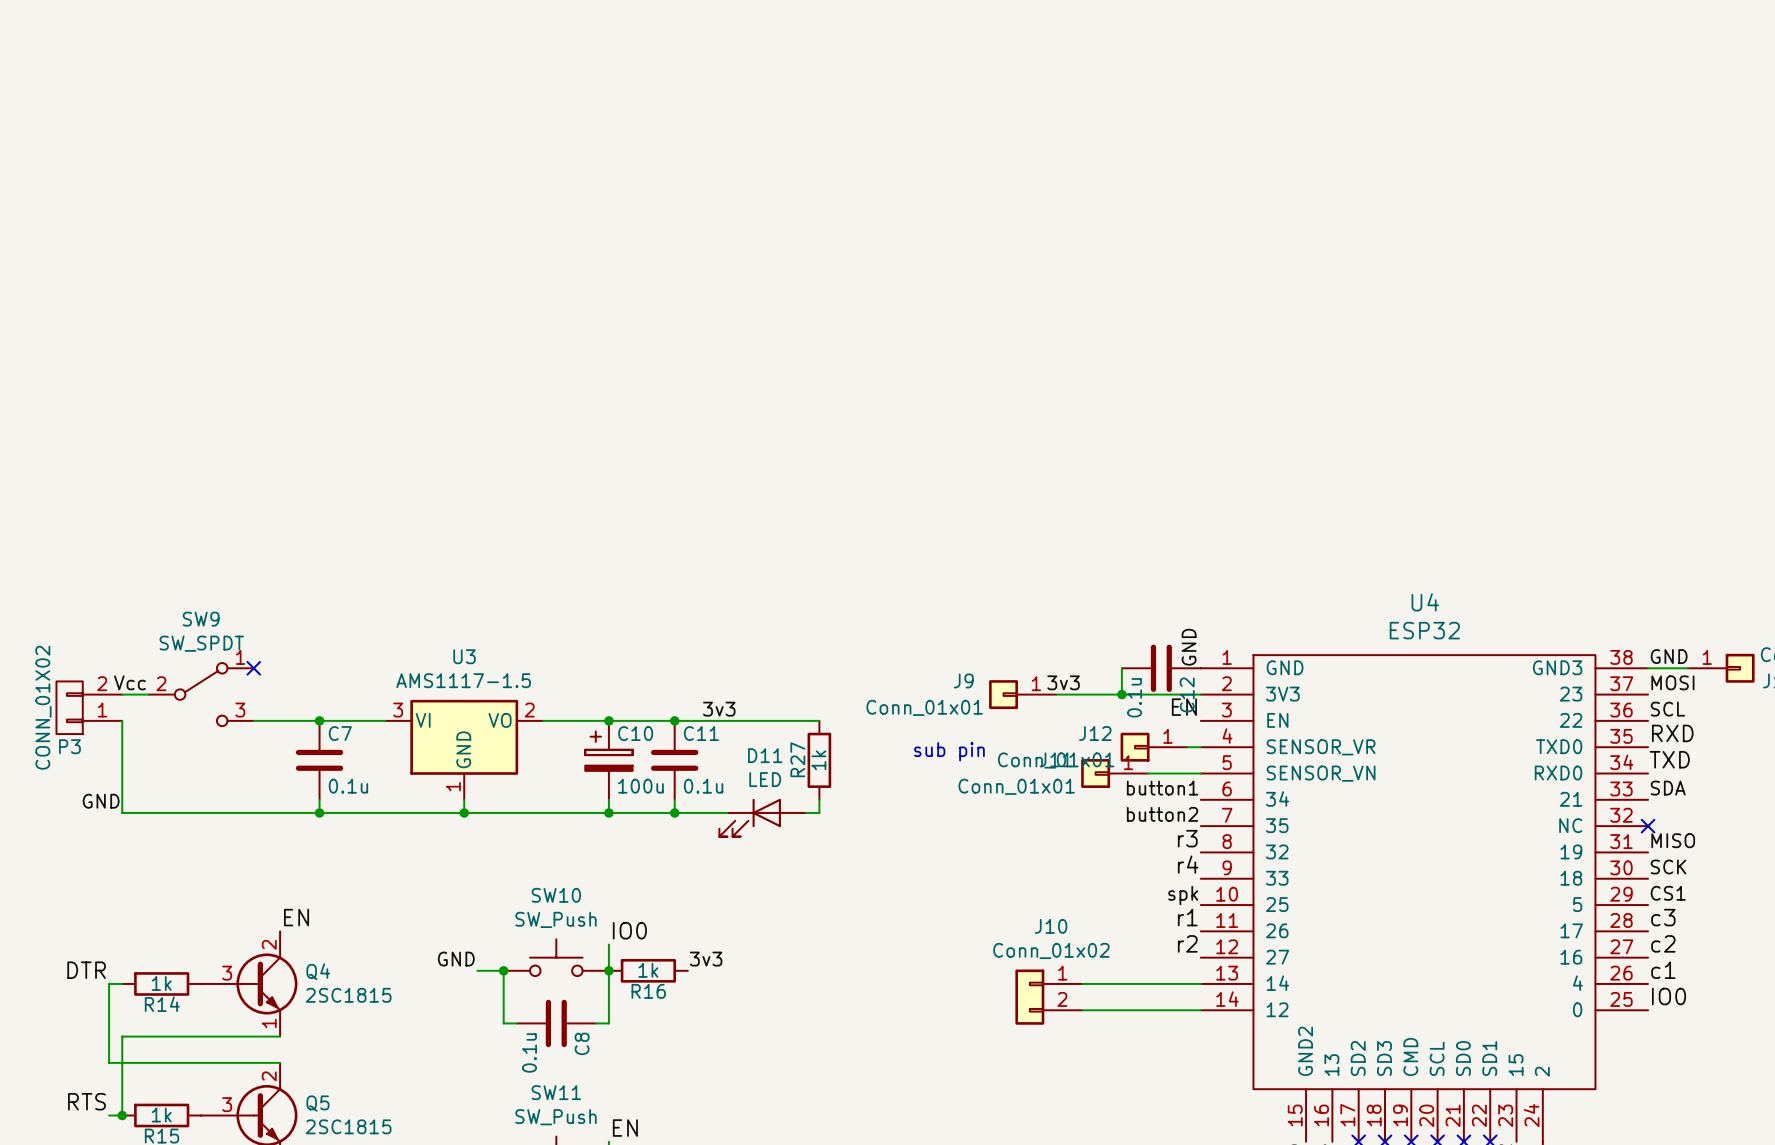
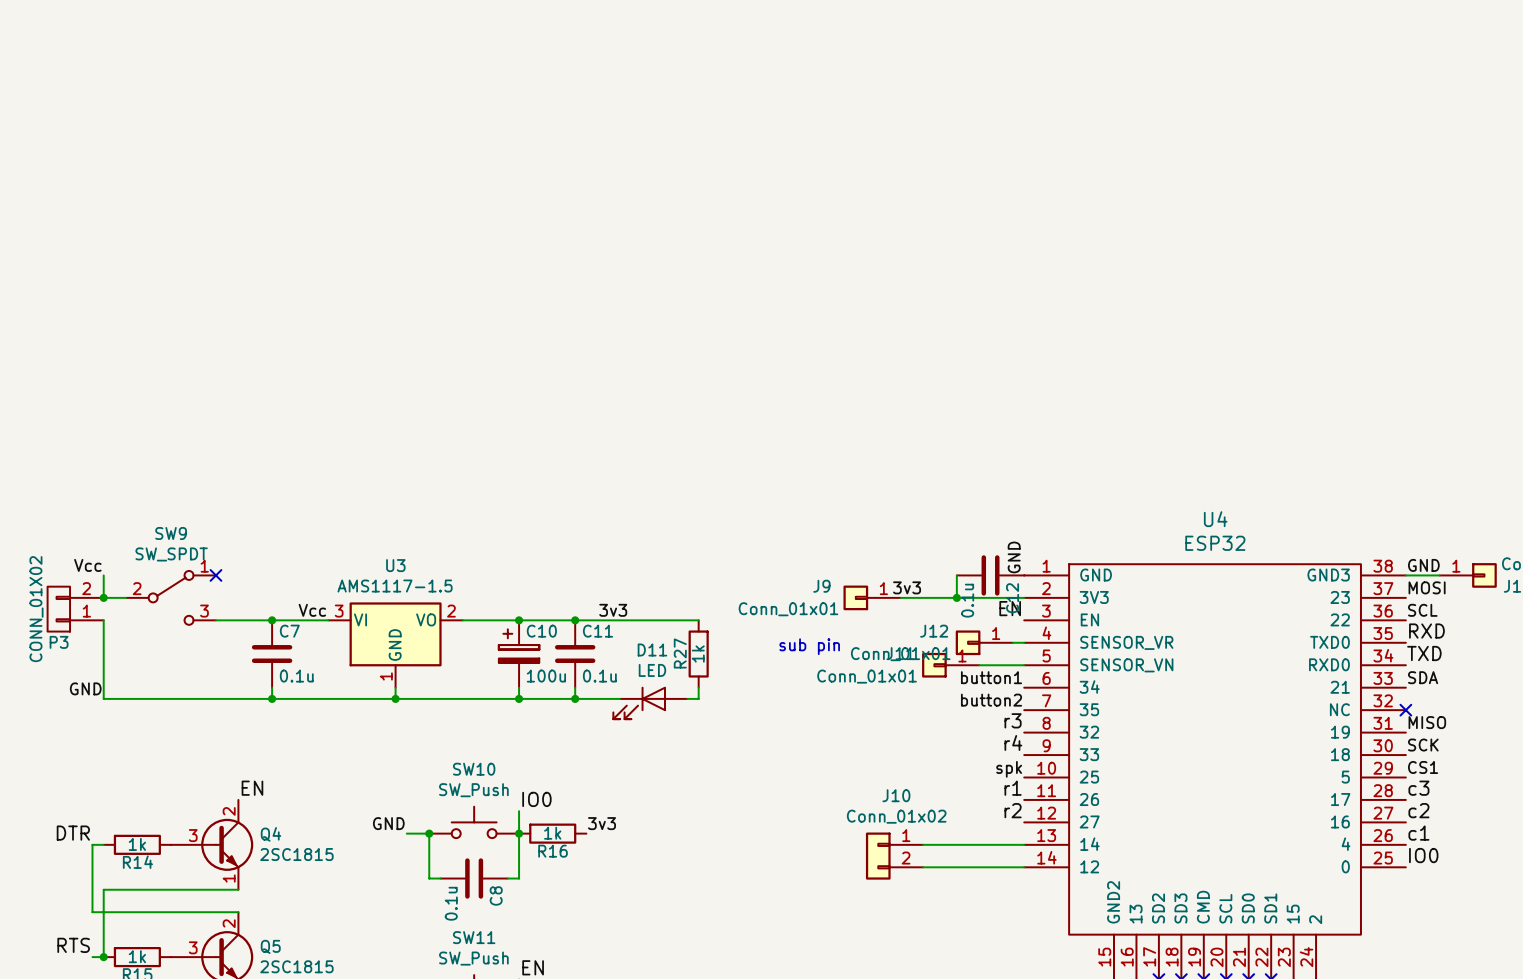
wire: none -> (103, 575) (103, 597)
label position: Vcc (129, 682) -> Vcc (87, 565)
junction: none -> (103, 597)
label: none -> Vcc (312, 610)

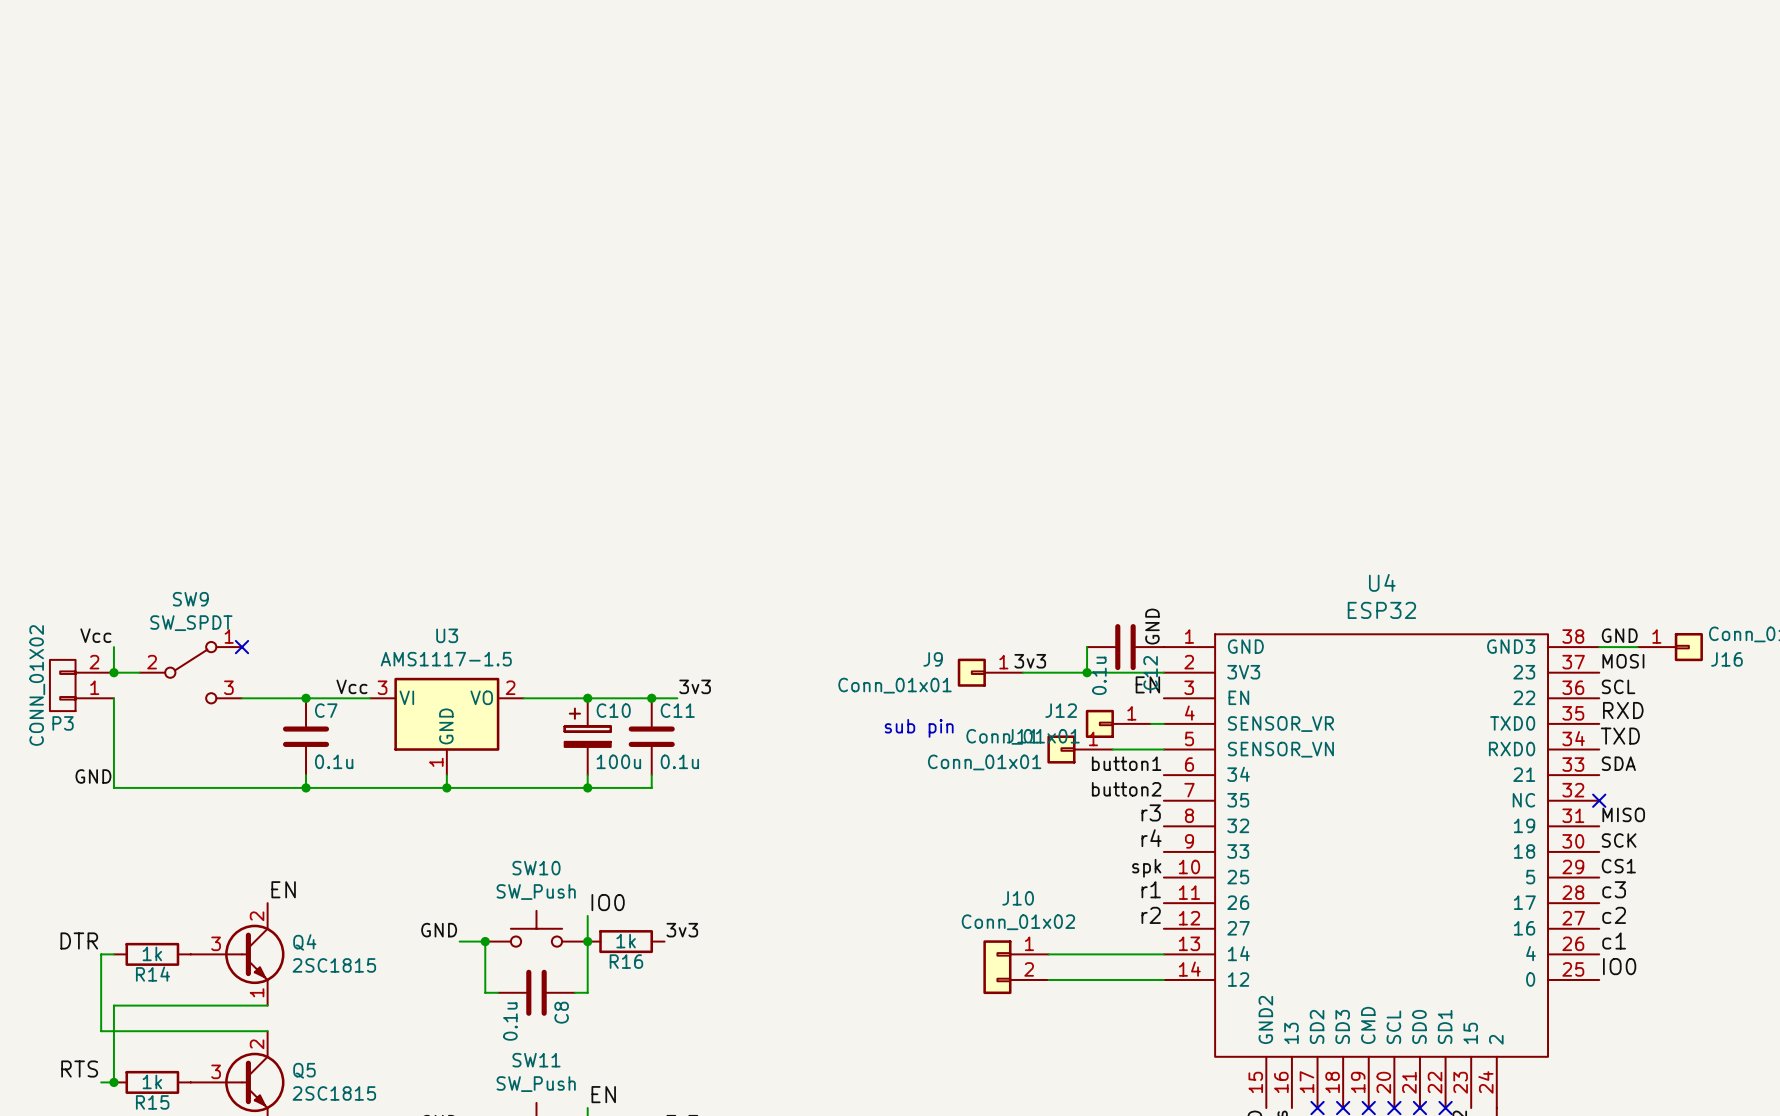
wire: (597, 620) (698, 620) -> none
R27: 1k (698, 654) -> none
wire: (698, 687) (698, 698) (687, 698) -> none
wire: (575, 698) (620, 698) -> none
junction: (575, 698) -> none
D11: LED (650, 702) -> none

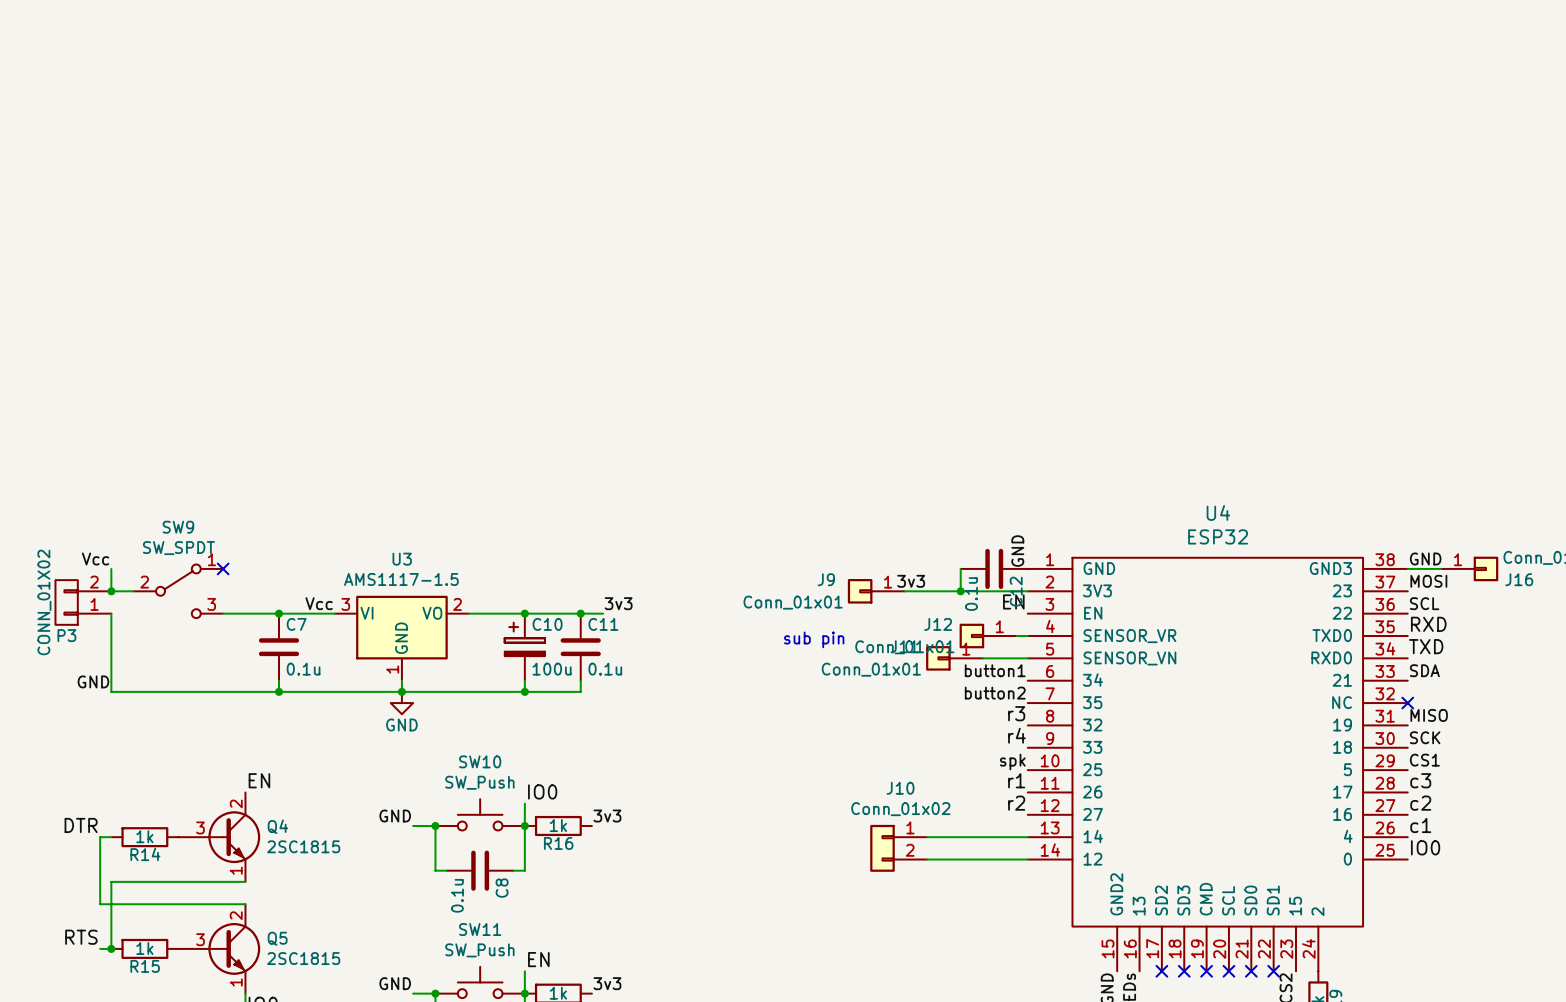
power symbol: none -> GND (401, 703)

